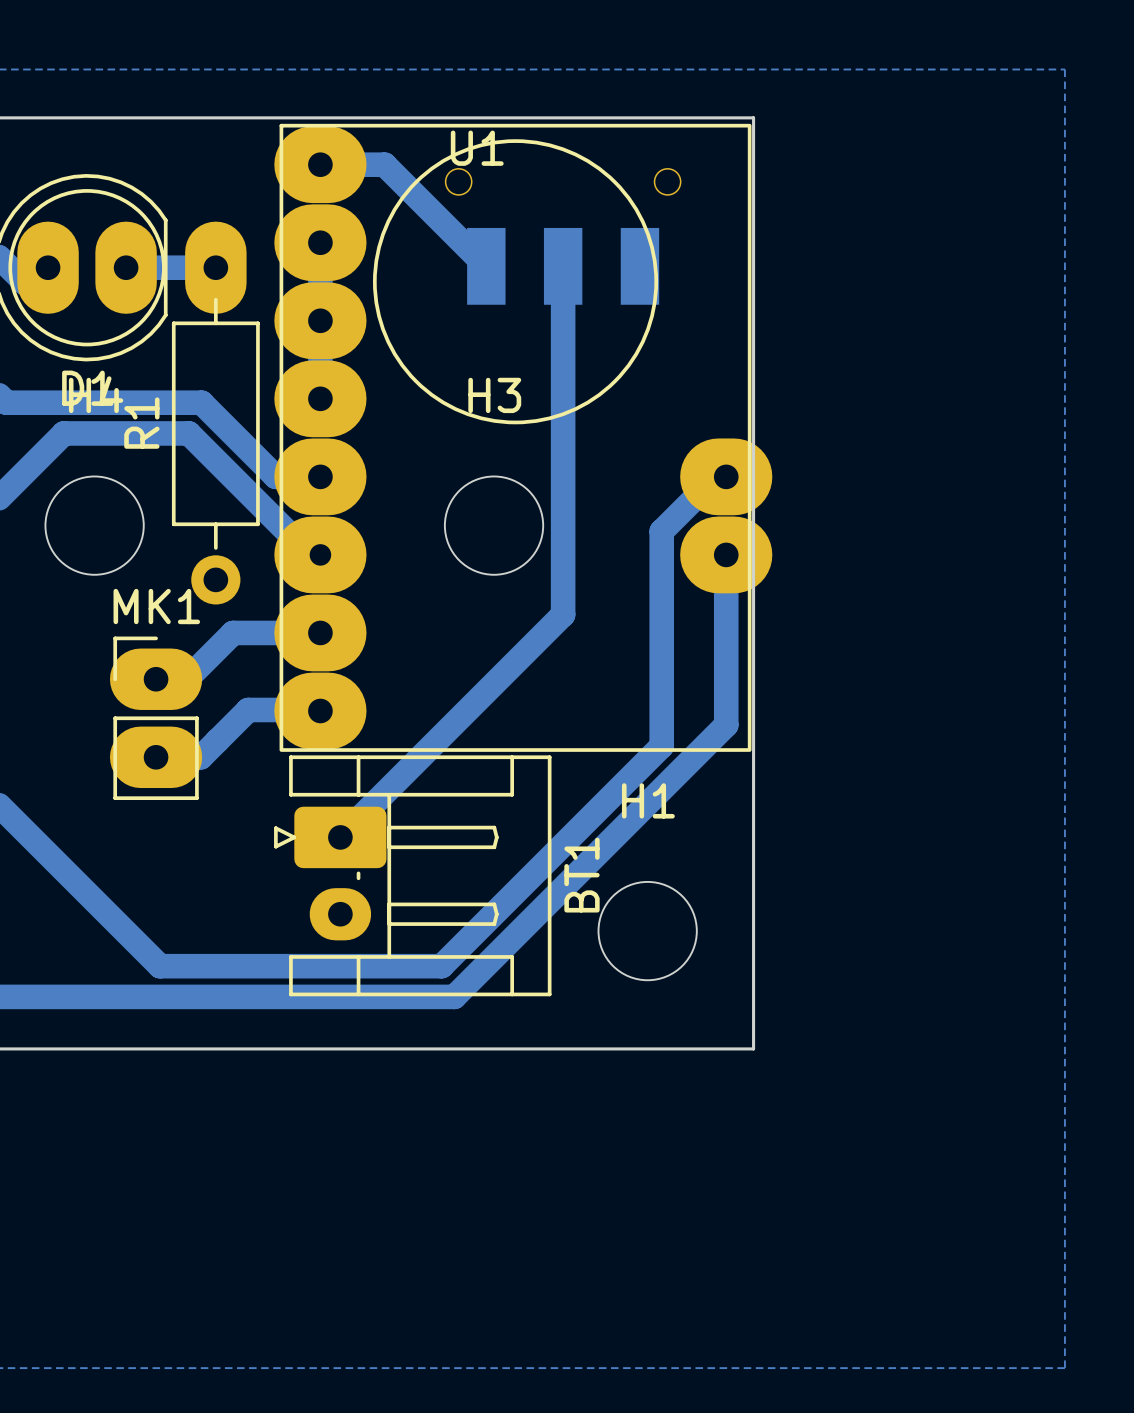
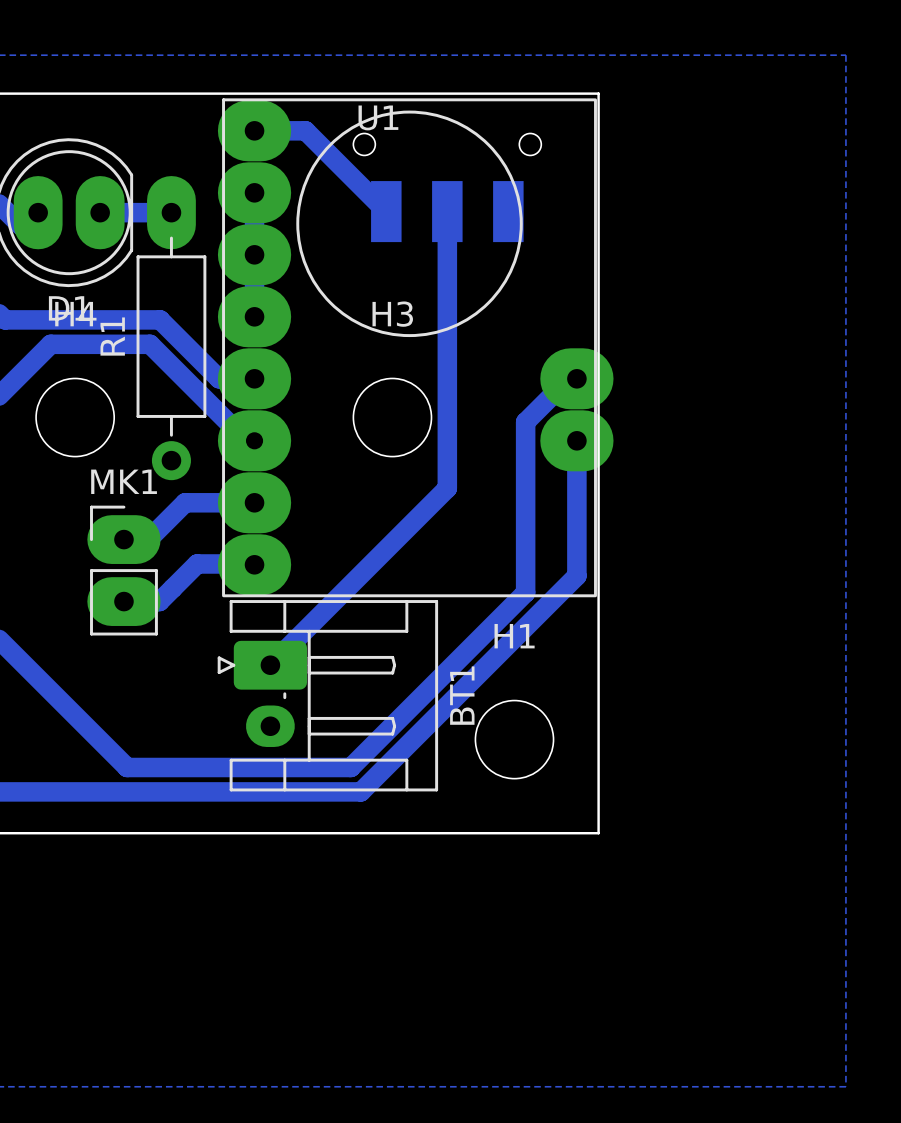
part footprint: [444, 168, 682, 305] -> [353, 133, 542, 243]

